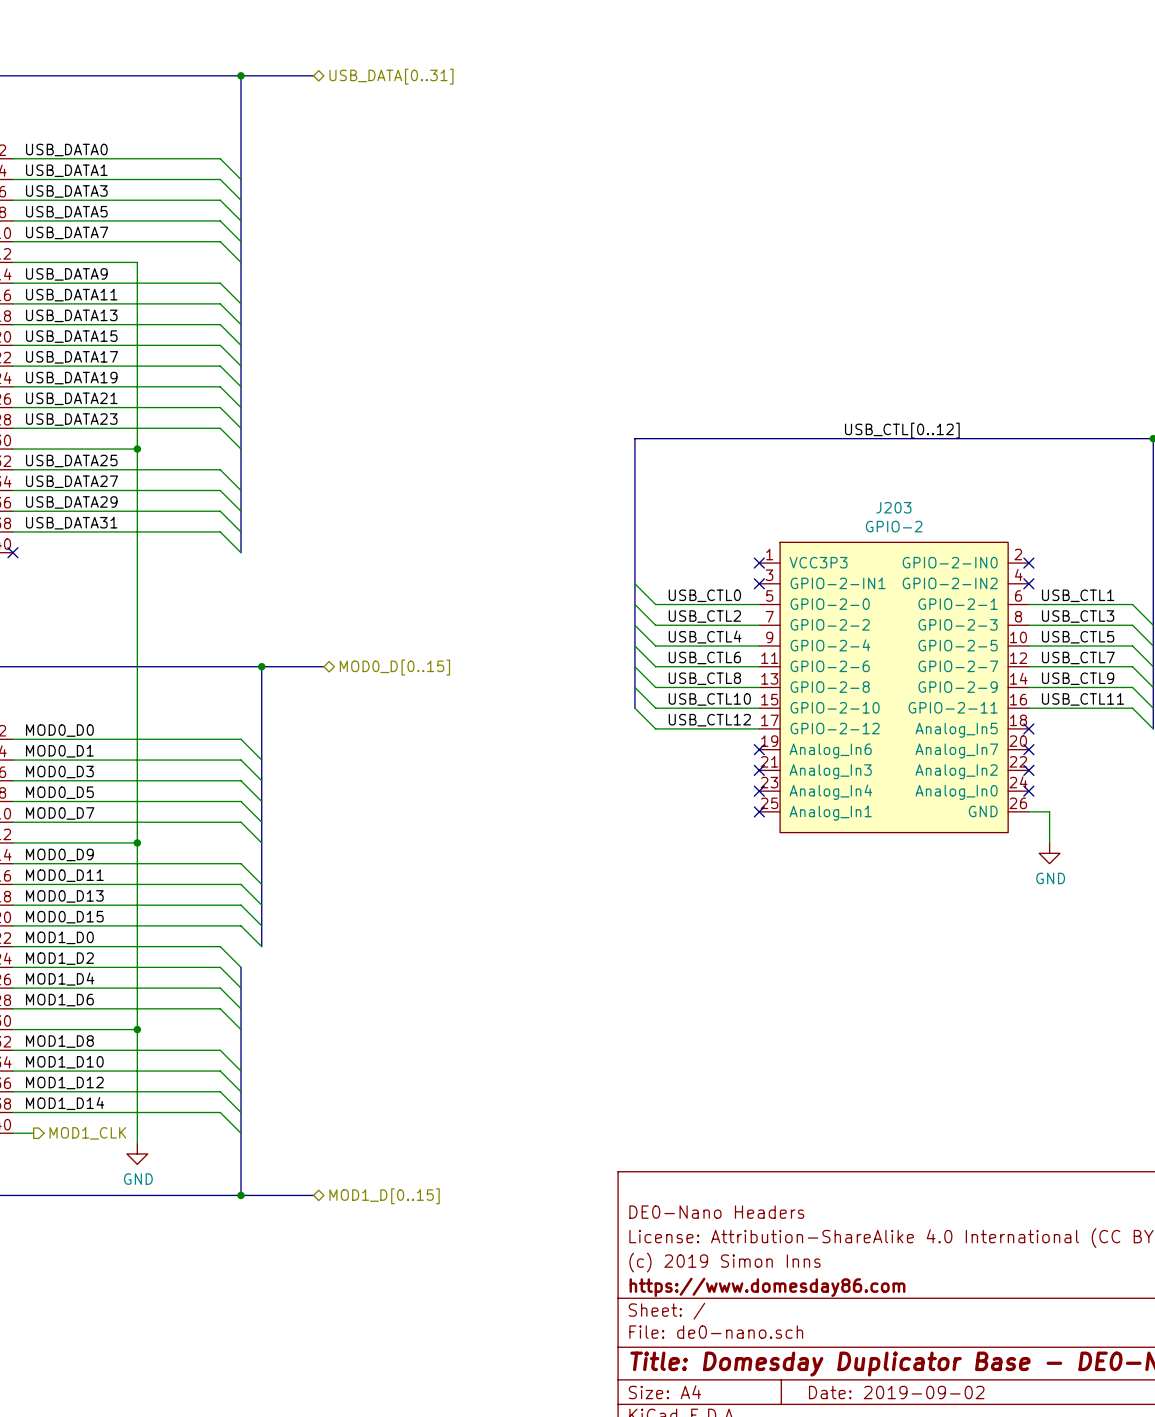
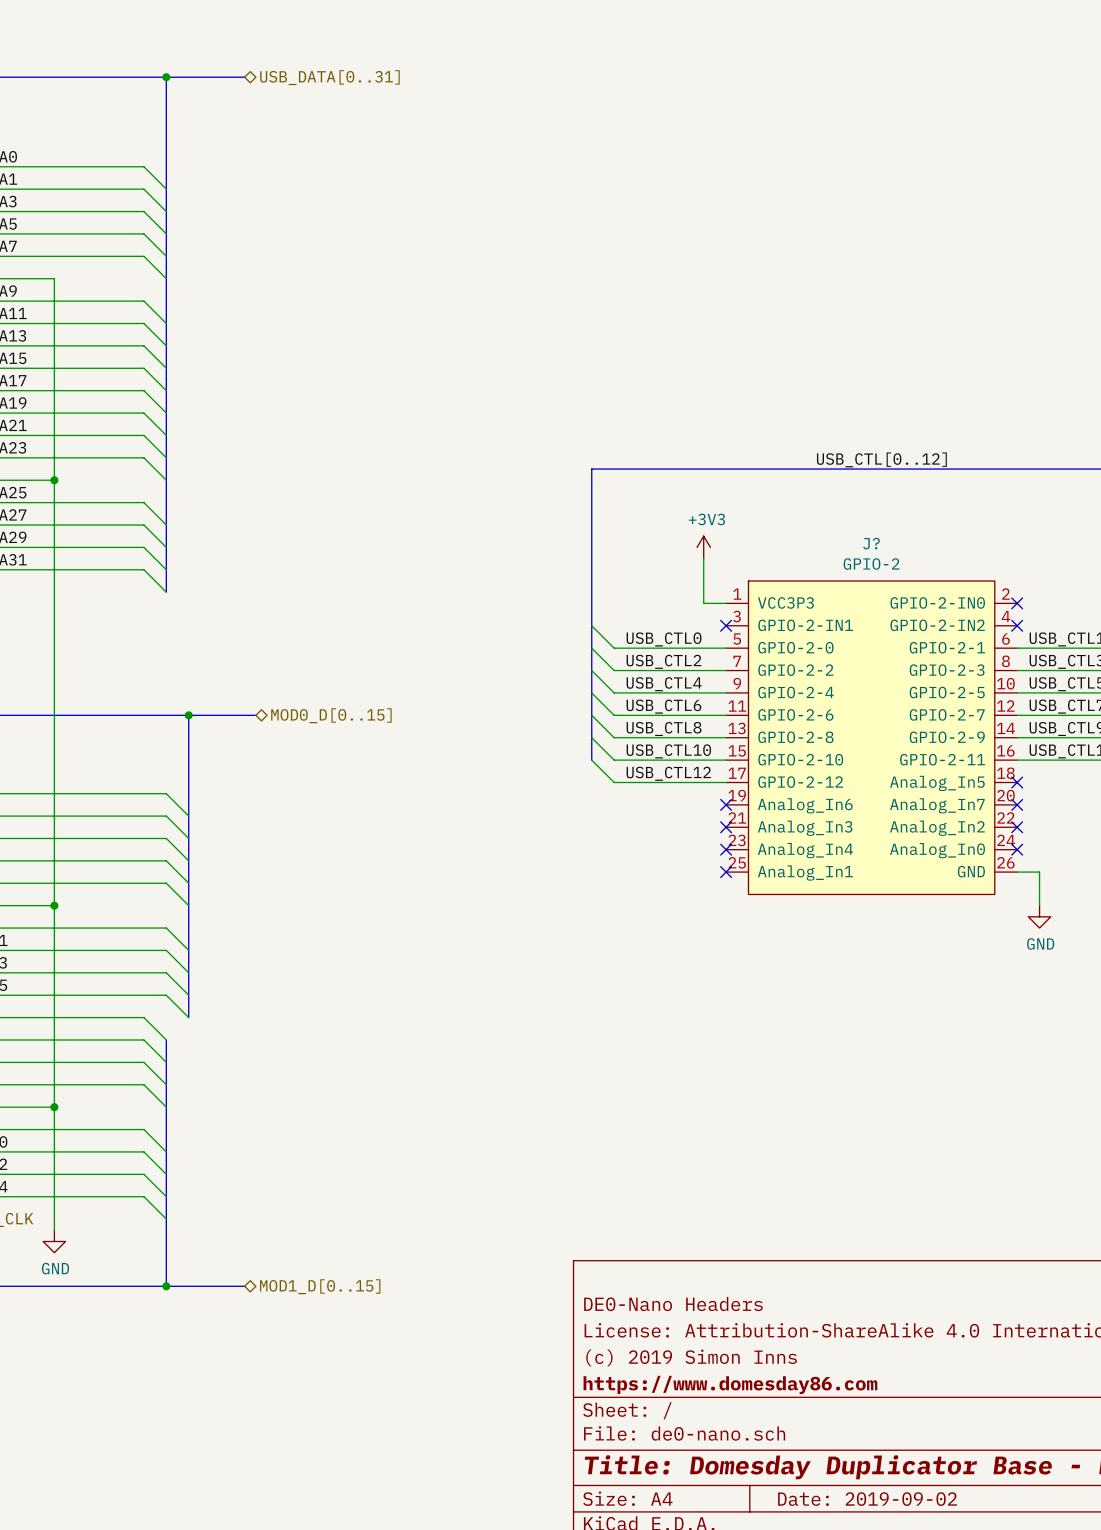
J203 name: J203 (893, 507) -> J? (871, 543)
power symbol: none -> +3V3 (703, 547)
wire: none -> (703, 558) (703, 603) (726, 603)
no-connect mark: (759, 563) -> none

